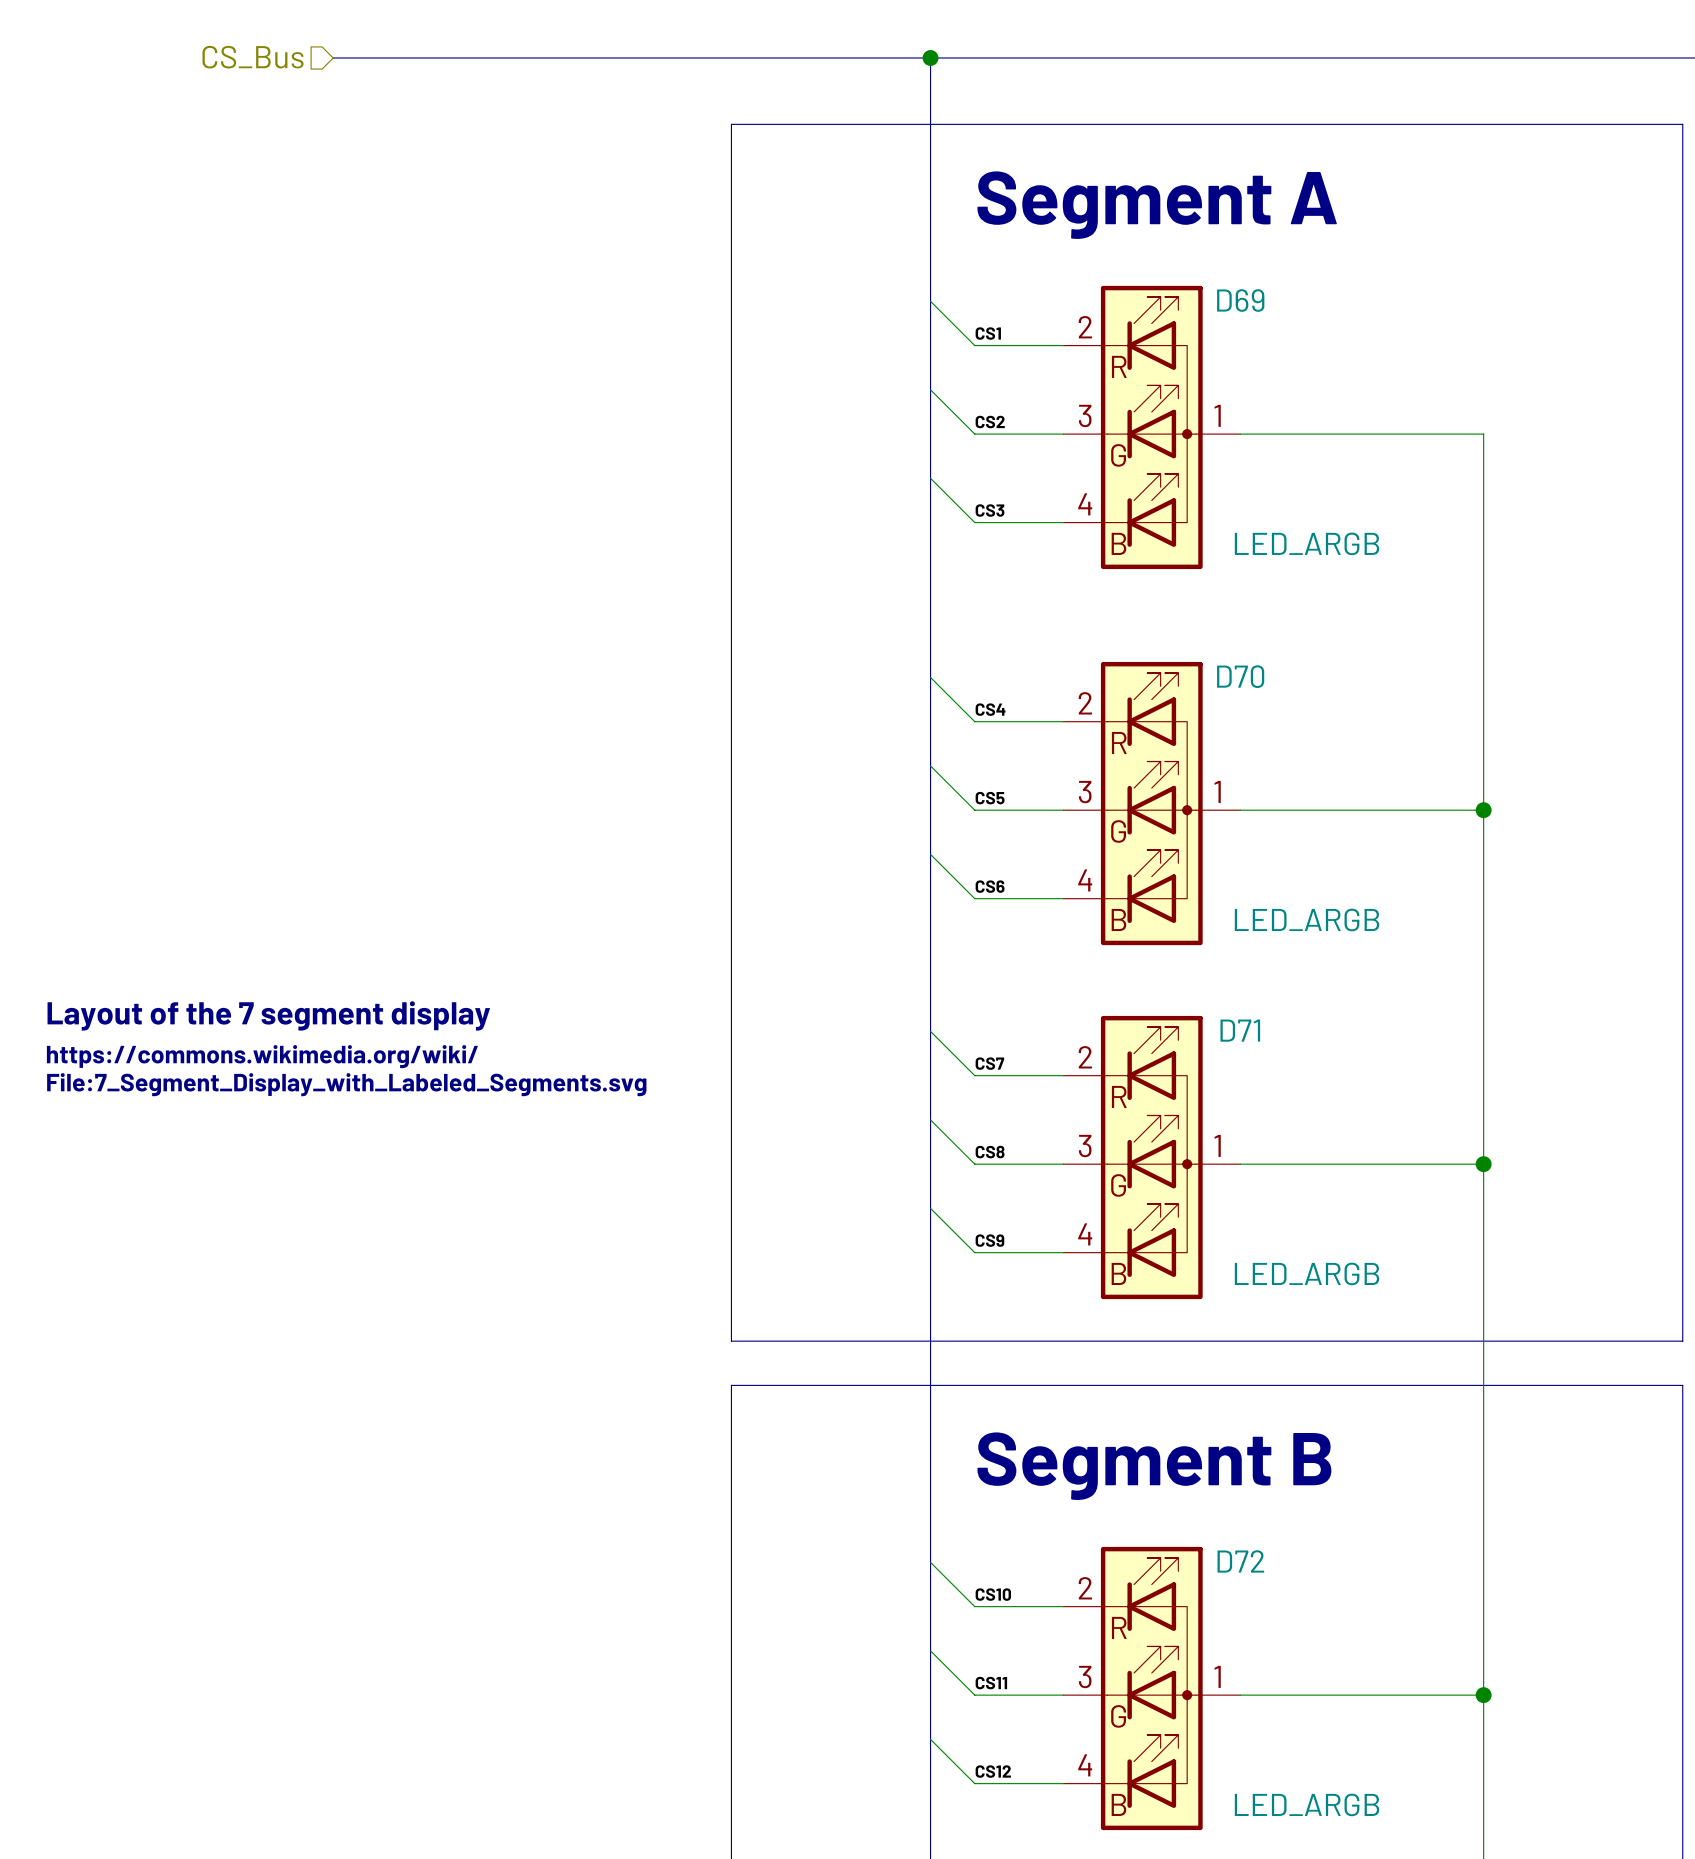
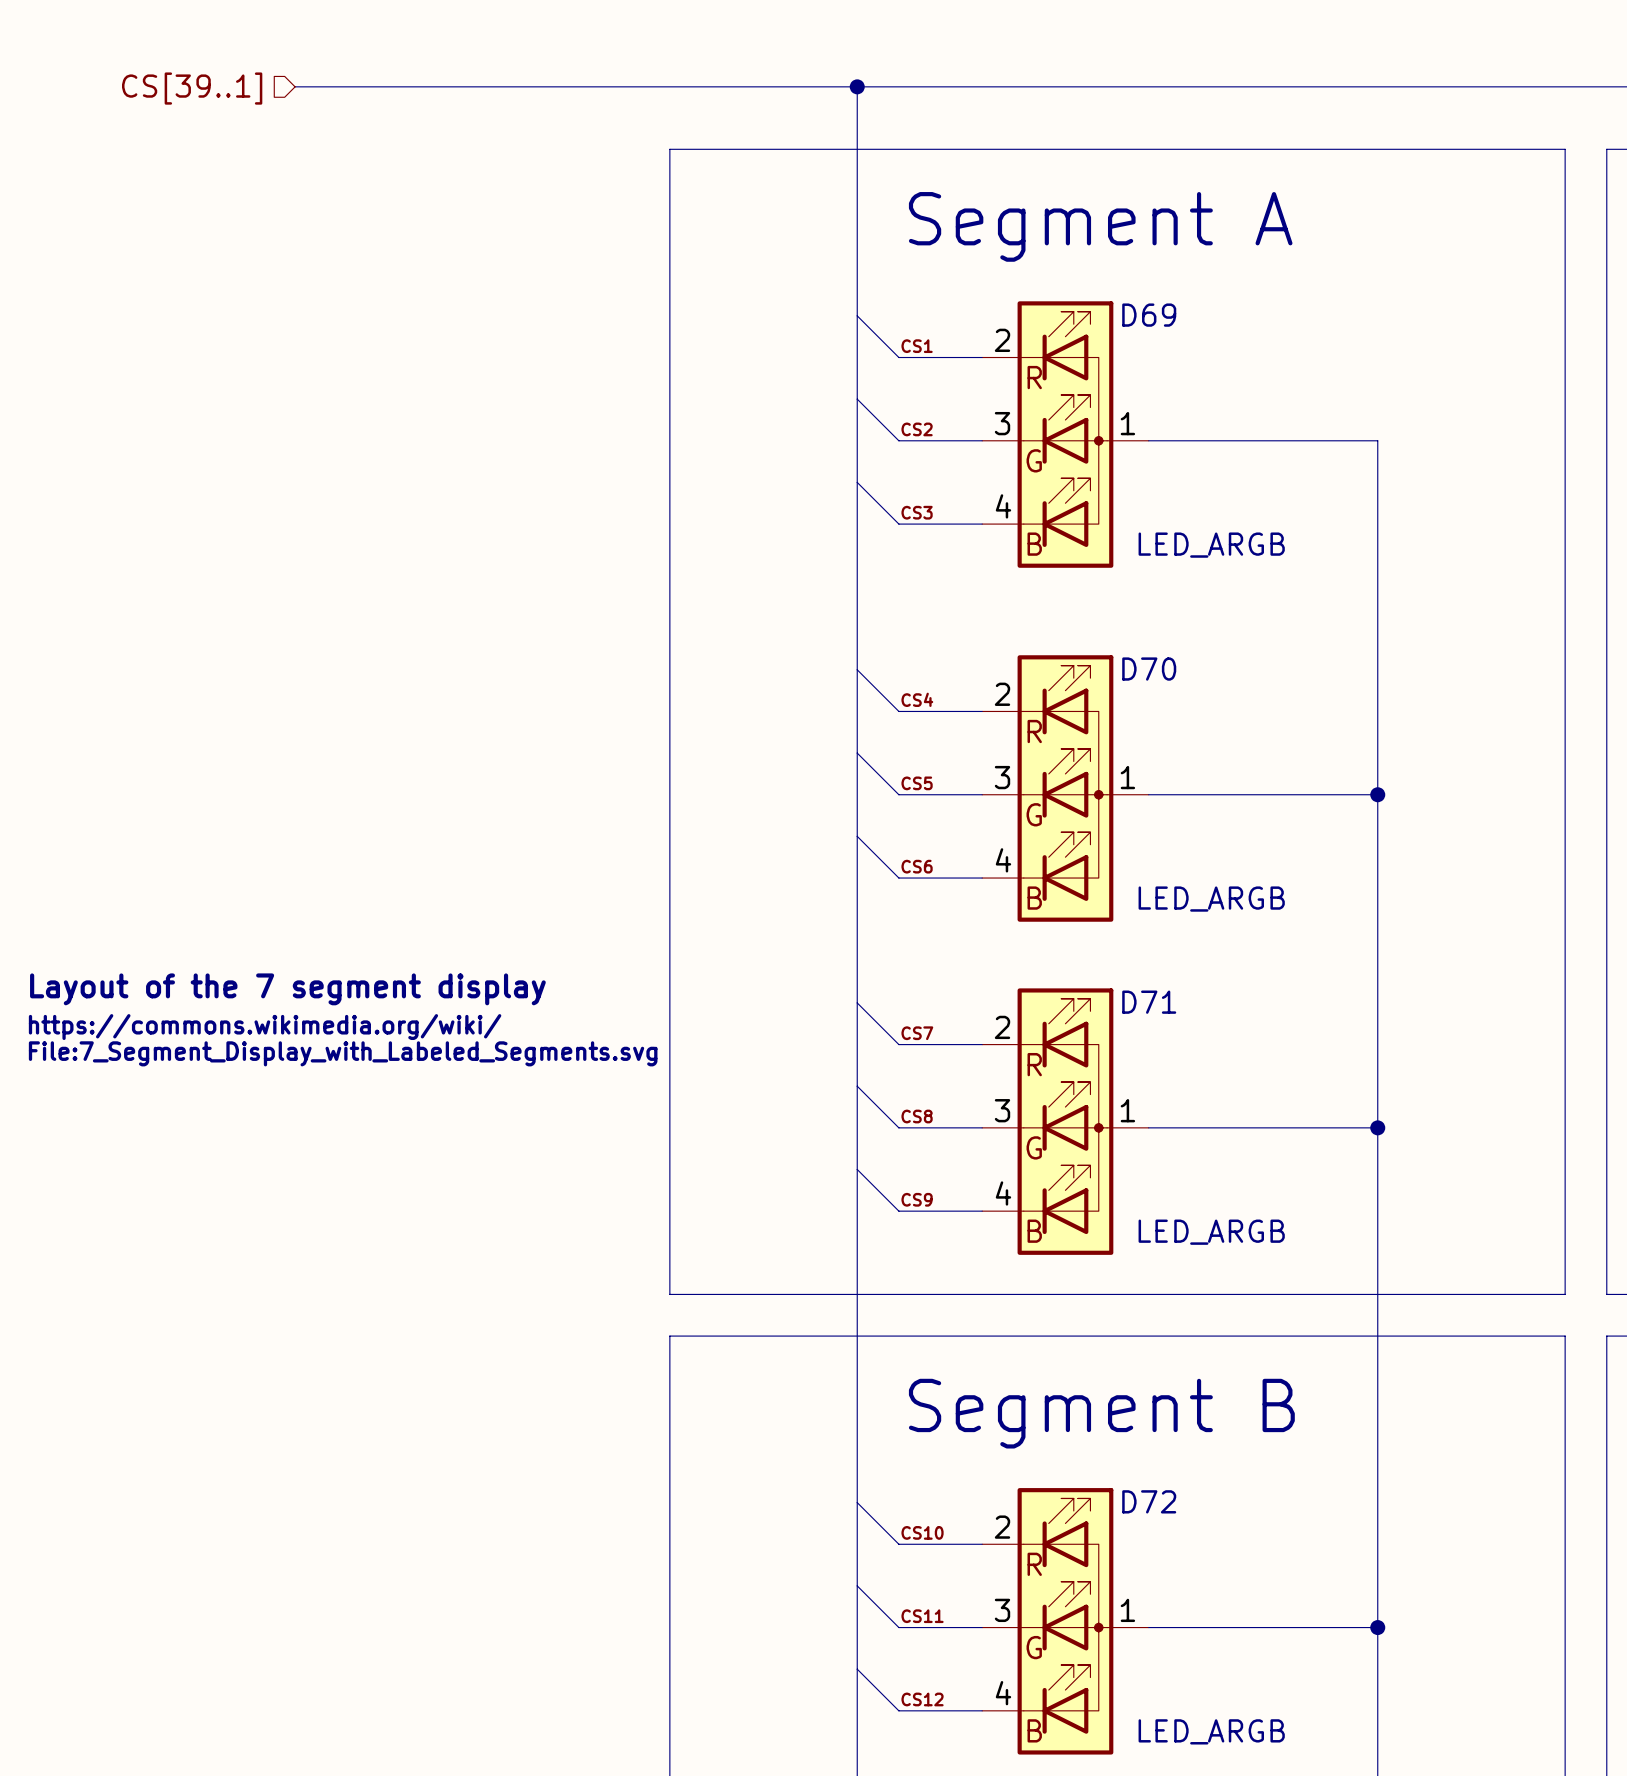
hierarchical label: CS_Bus (253, 57) -> CS[39..1] (192, 88)

